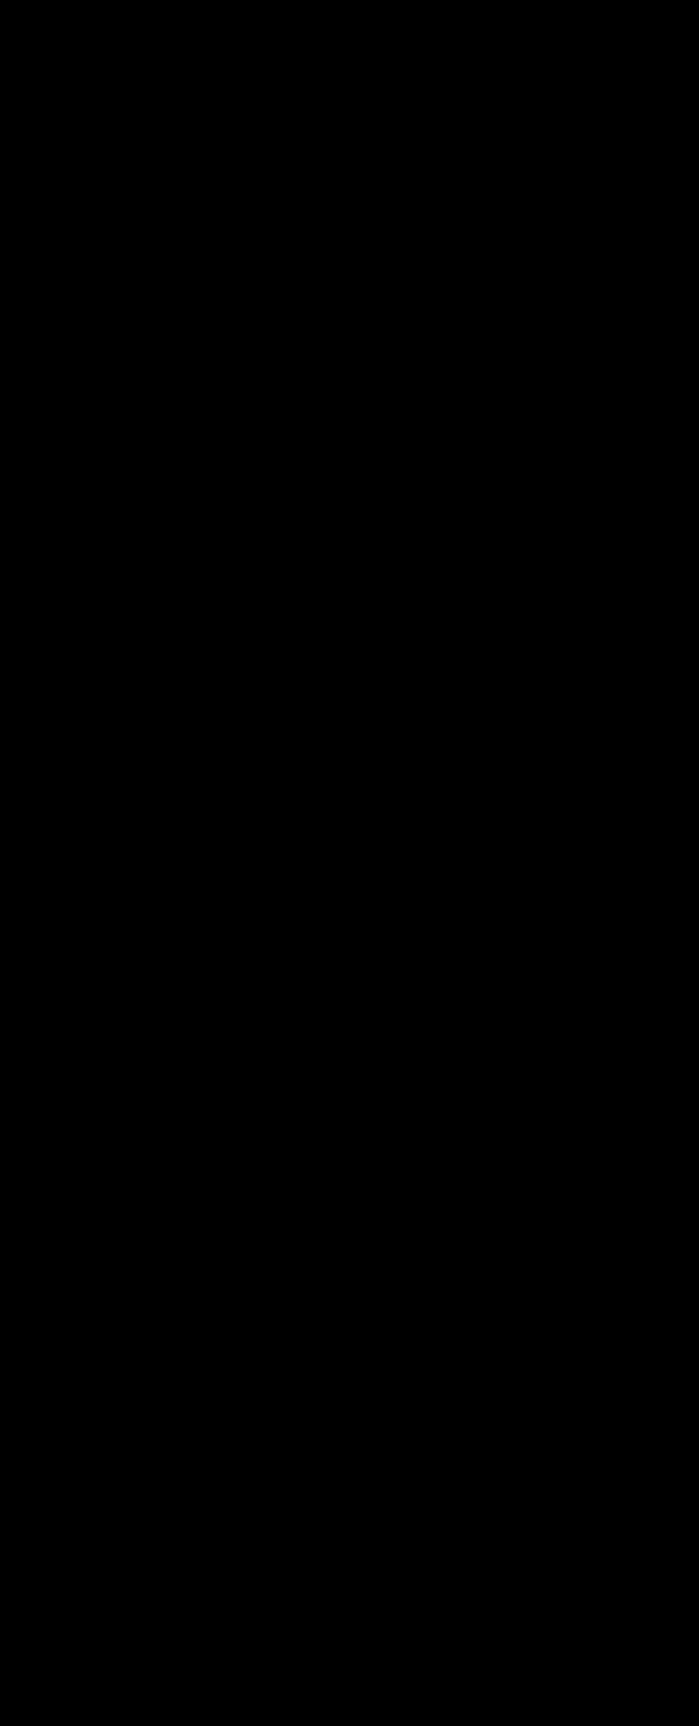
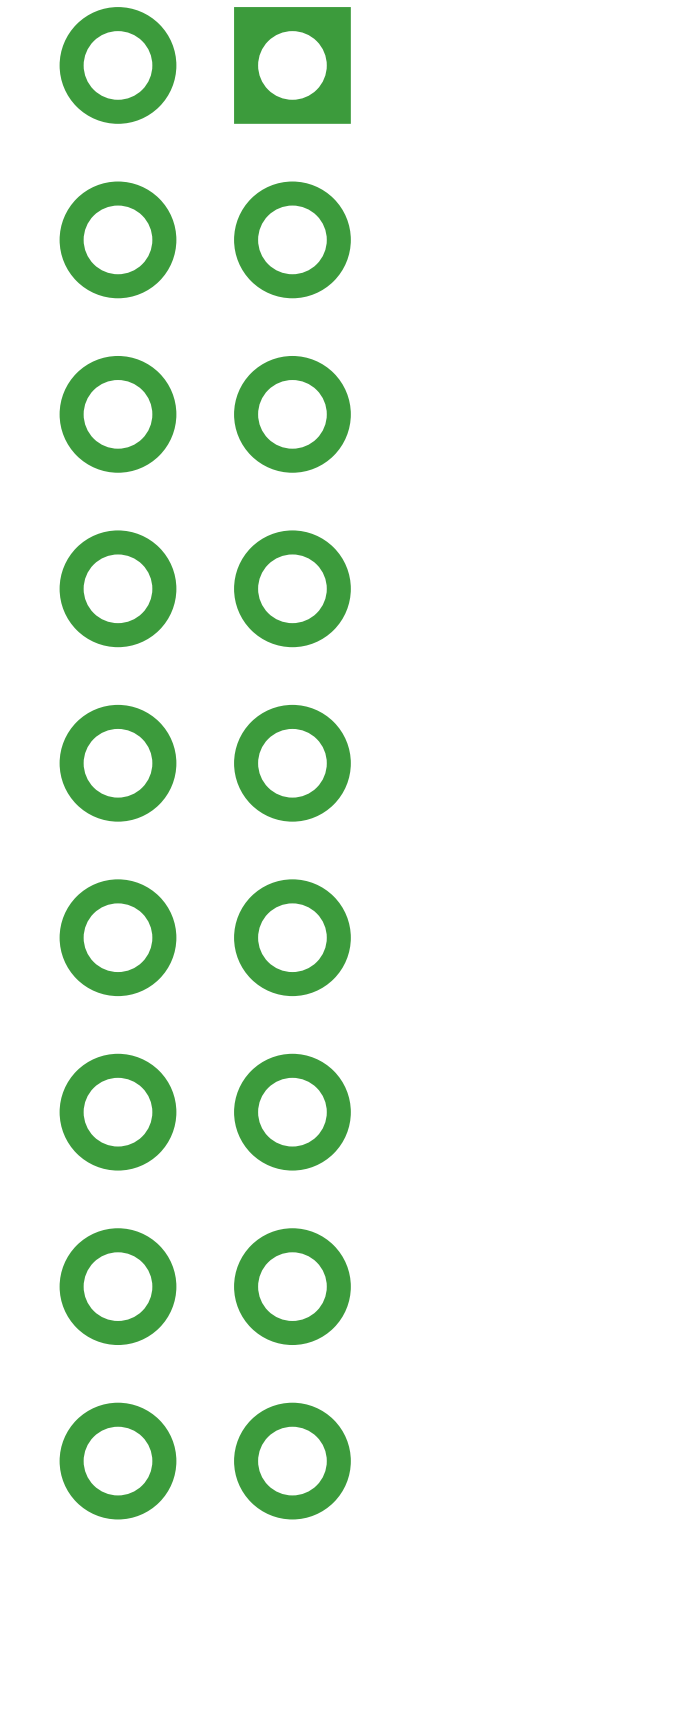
part: none -> (205, 763)

